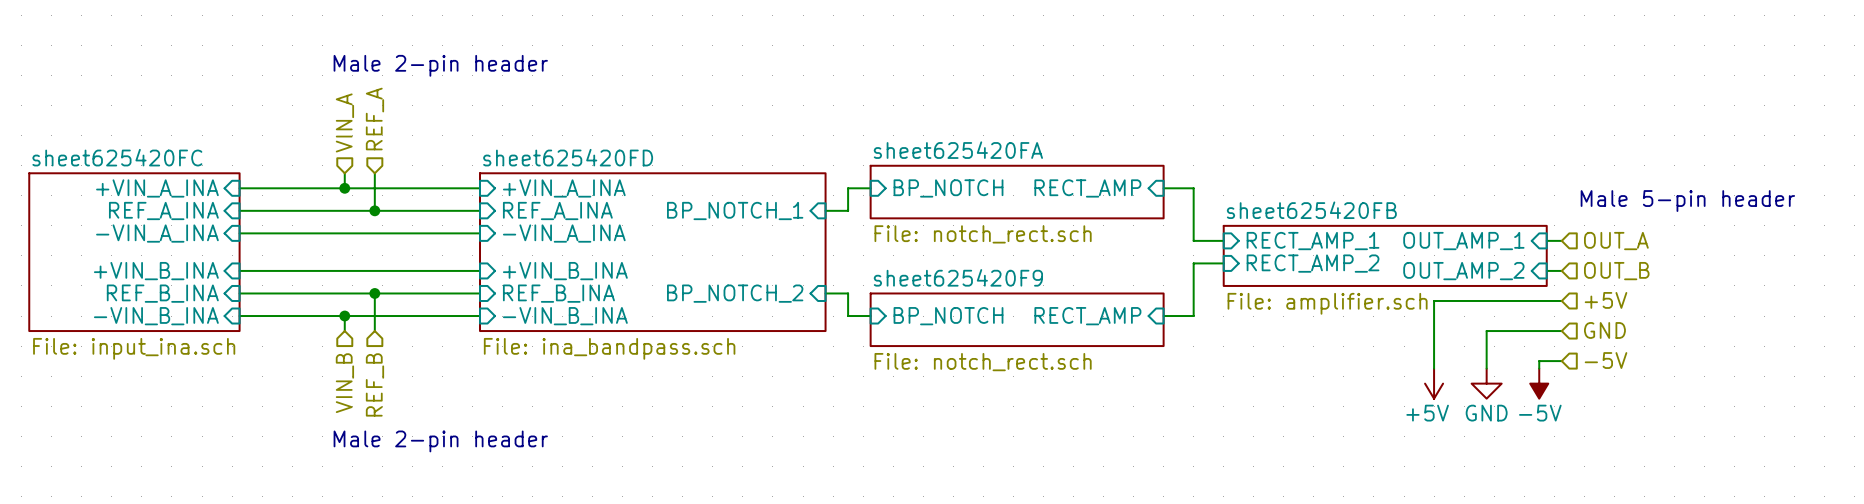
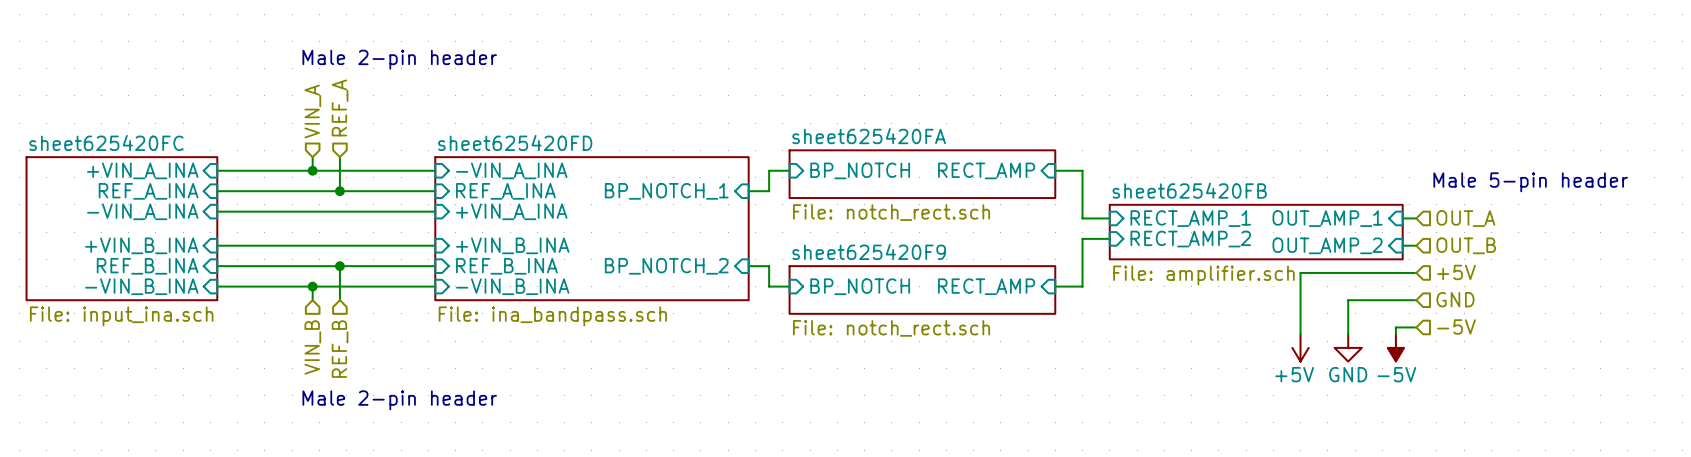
sheet pin: +VIN_A_INA (564, 188) -> -VIN_A_INA (511, 170)
sheet pin: -VIN_A_INA (564, 233) -> +VIN_A_INA (511, 211)

